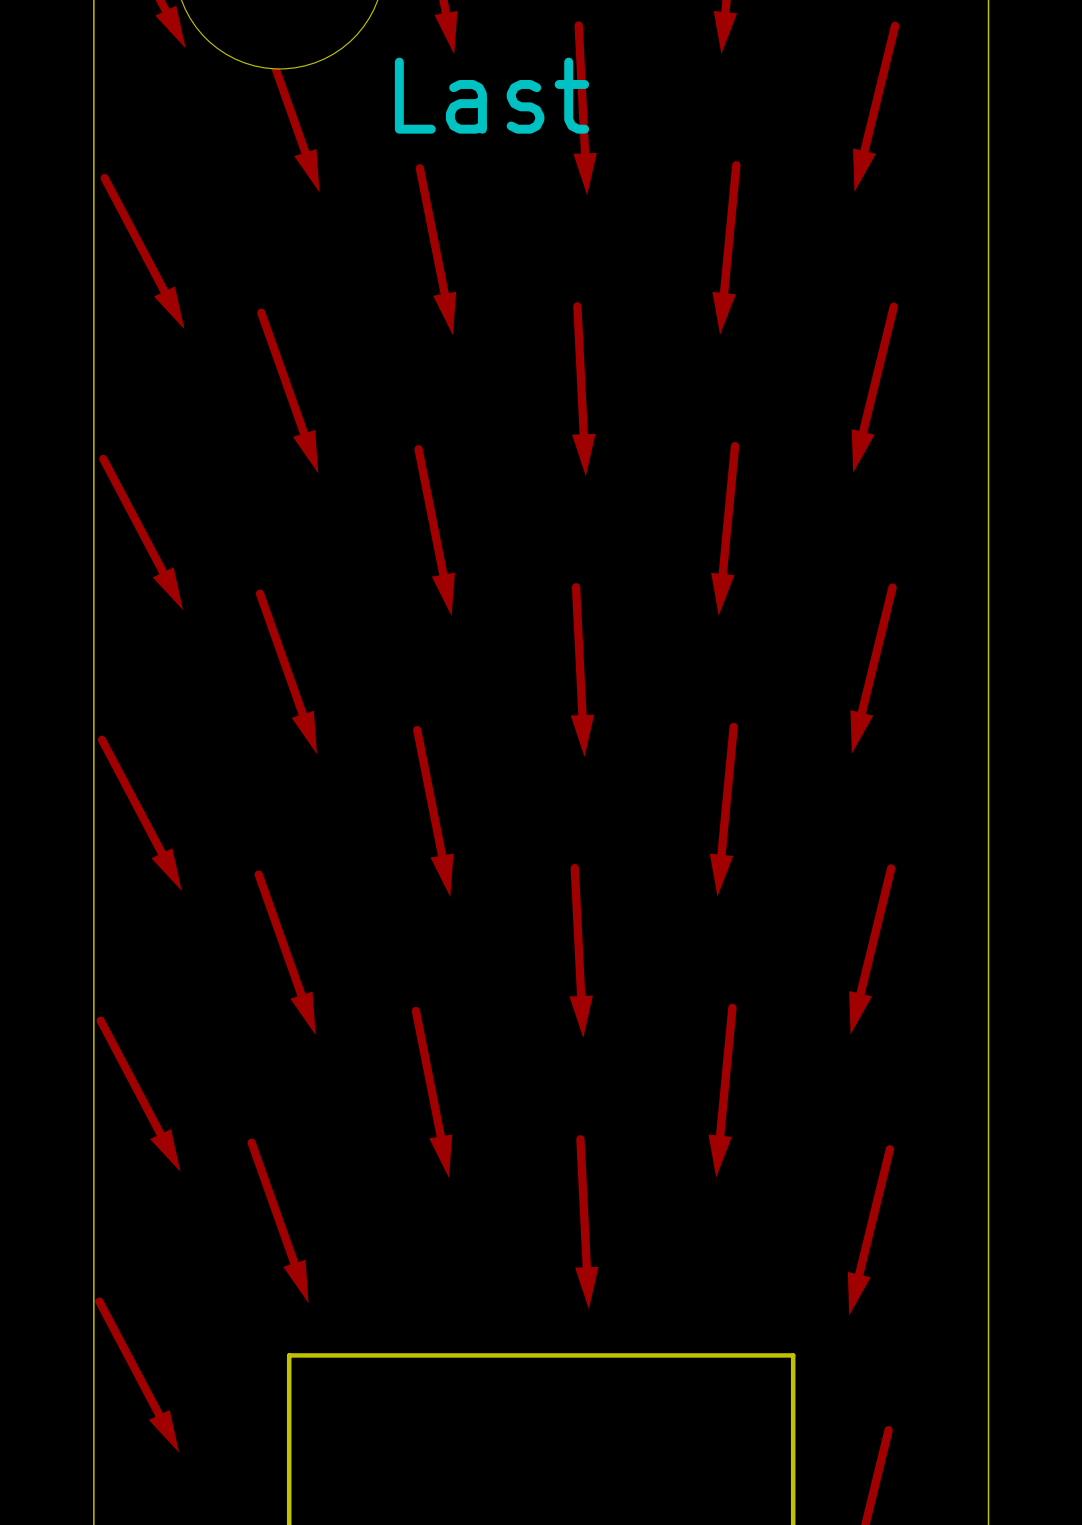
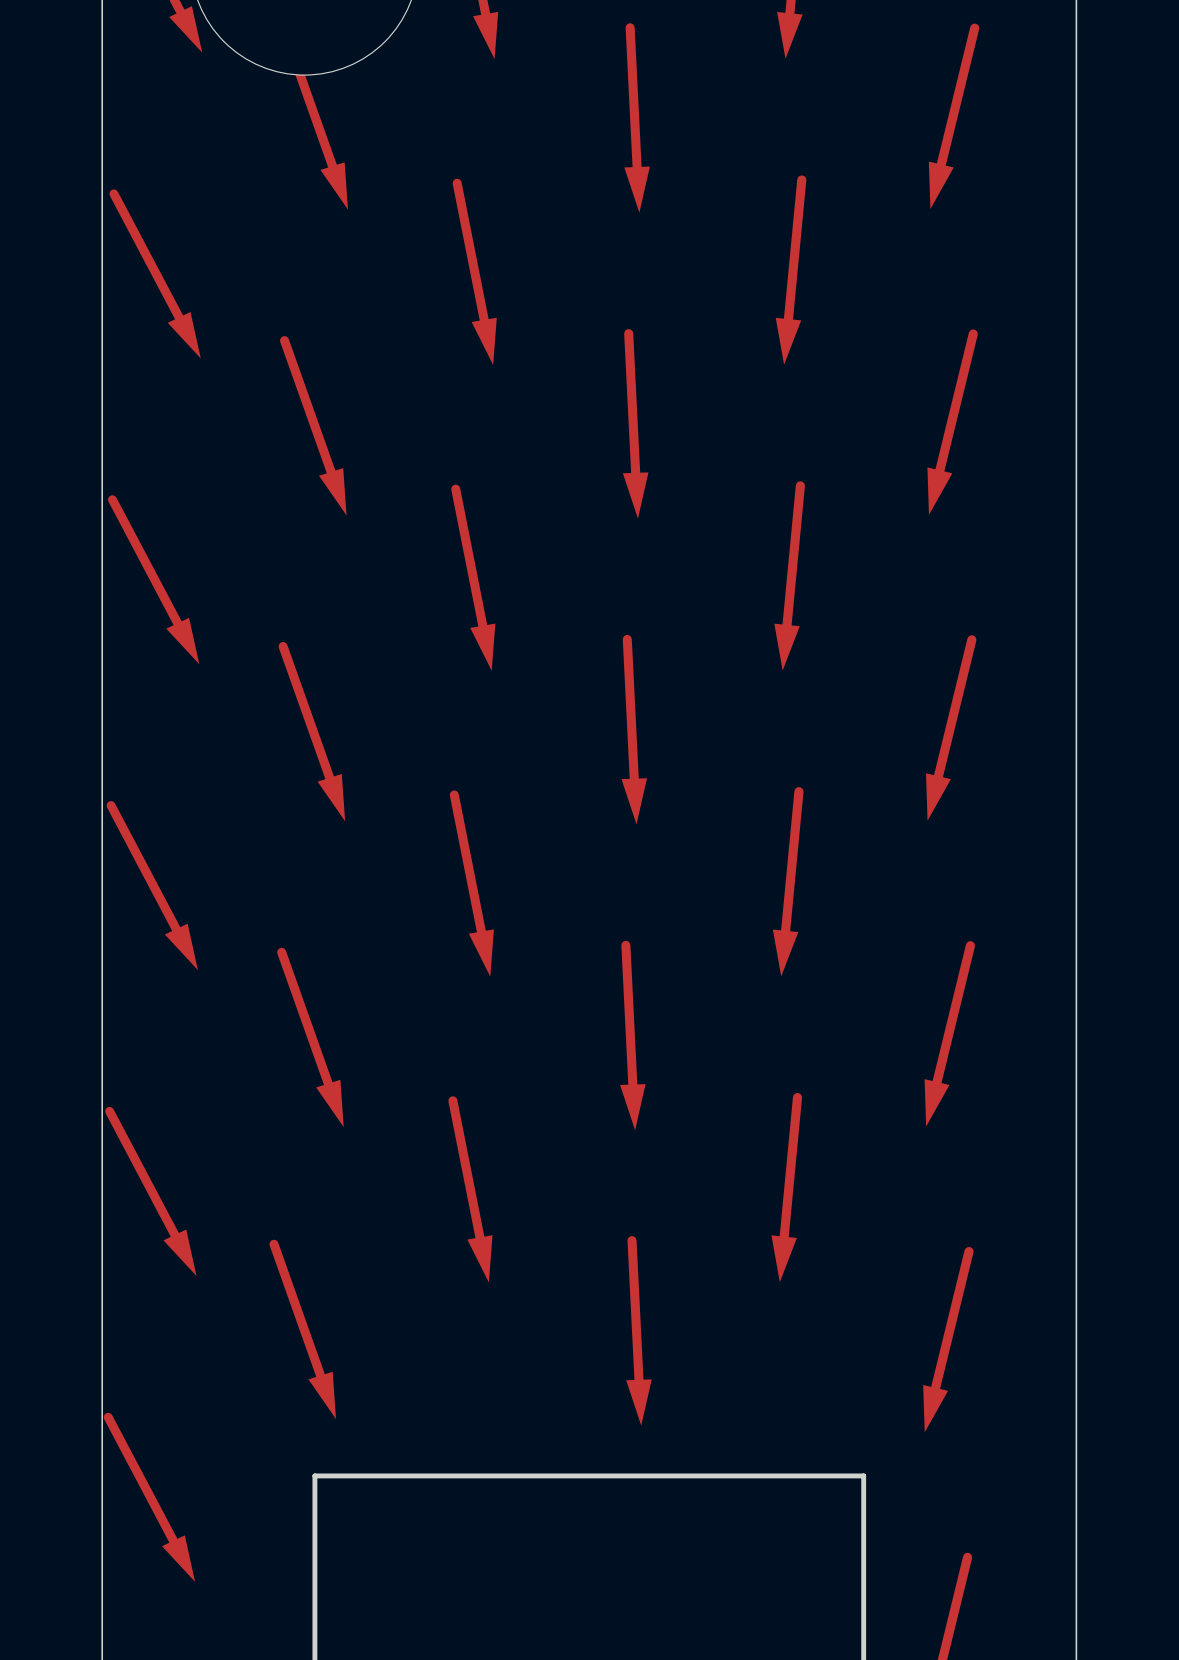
text: Last (492, 95) -> none

